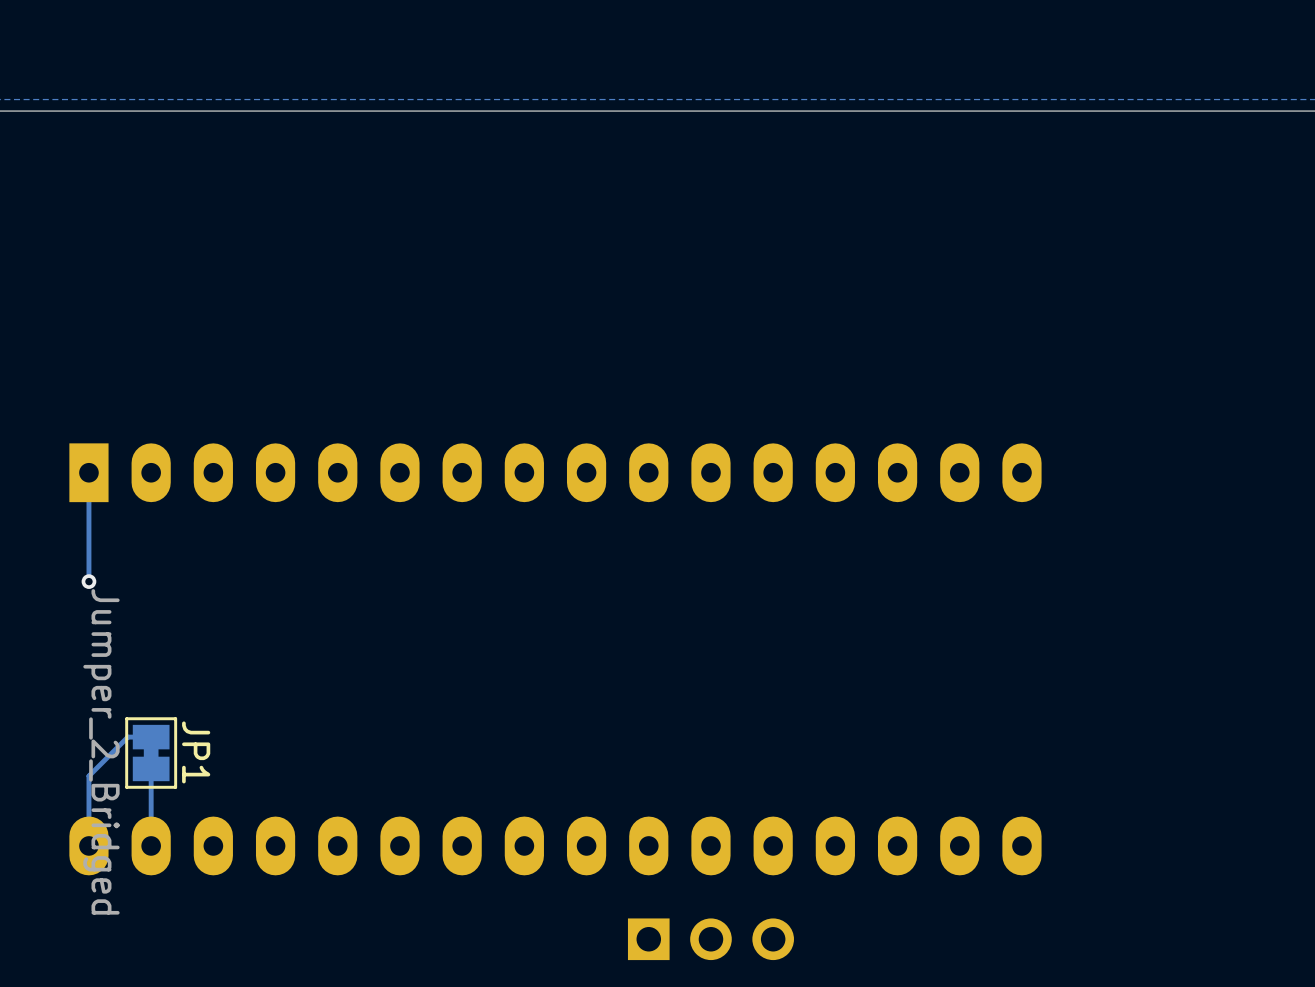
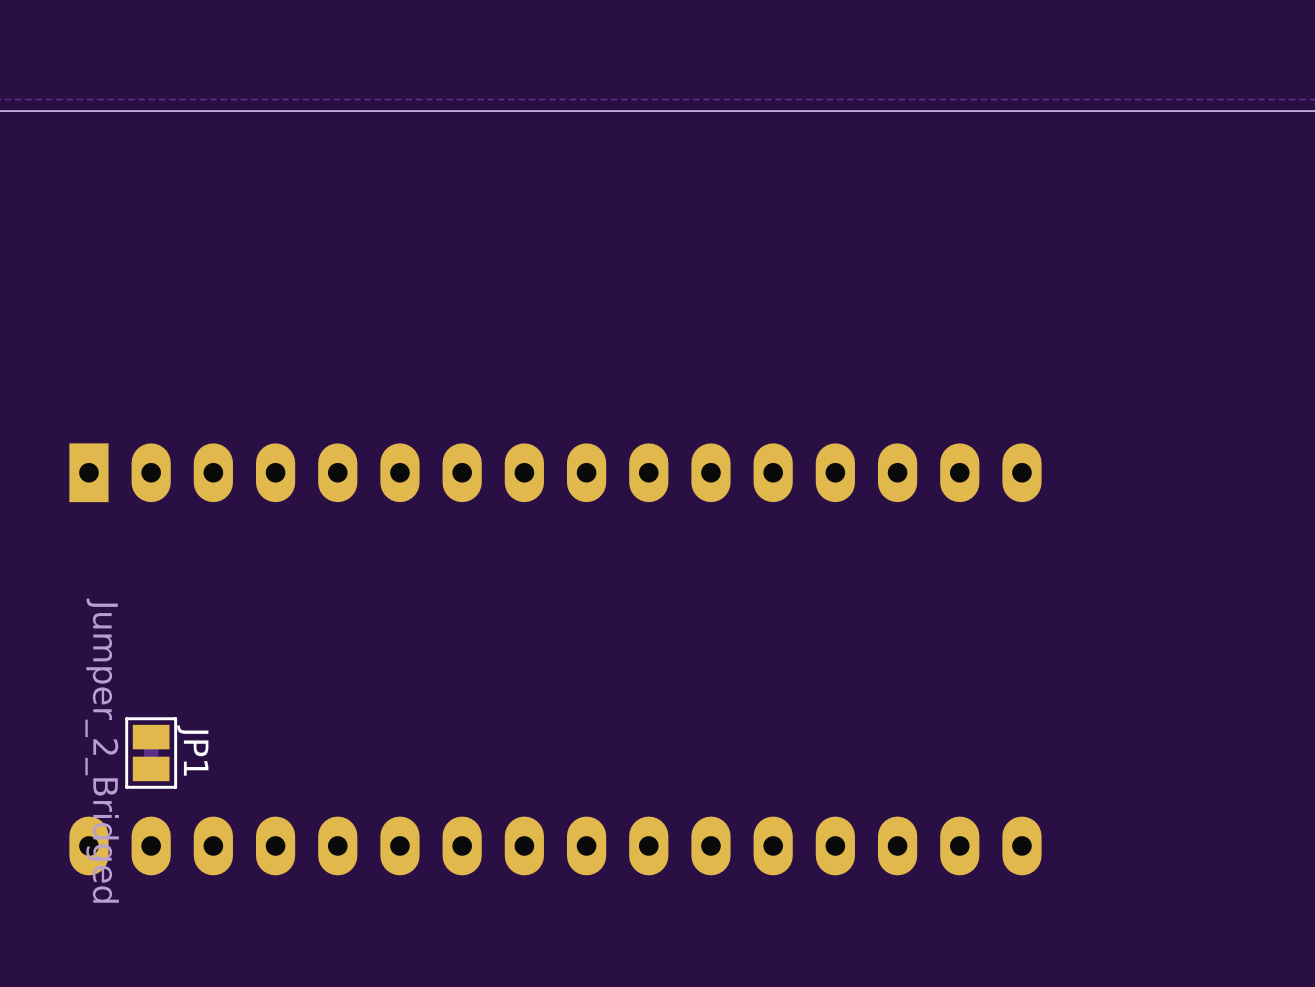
track: (88, 472) (88, 581) -> none
via: (88, 581) -> none
track: (151, 737) (127, 737) (88, 776) (88, 845) -> none
track: (151, 768) (151, 845) -> none
part: (710, 939) -> none

